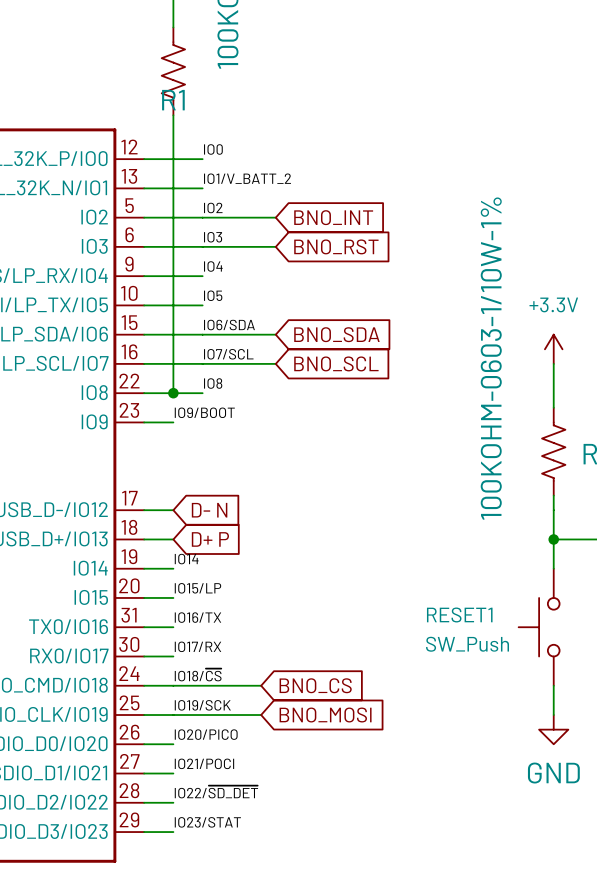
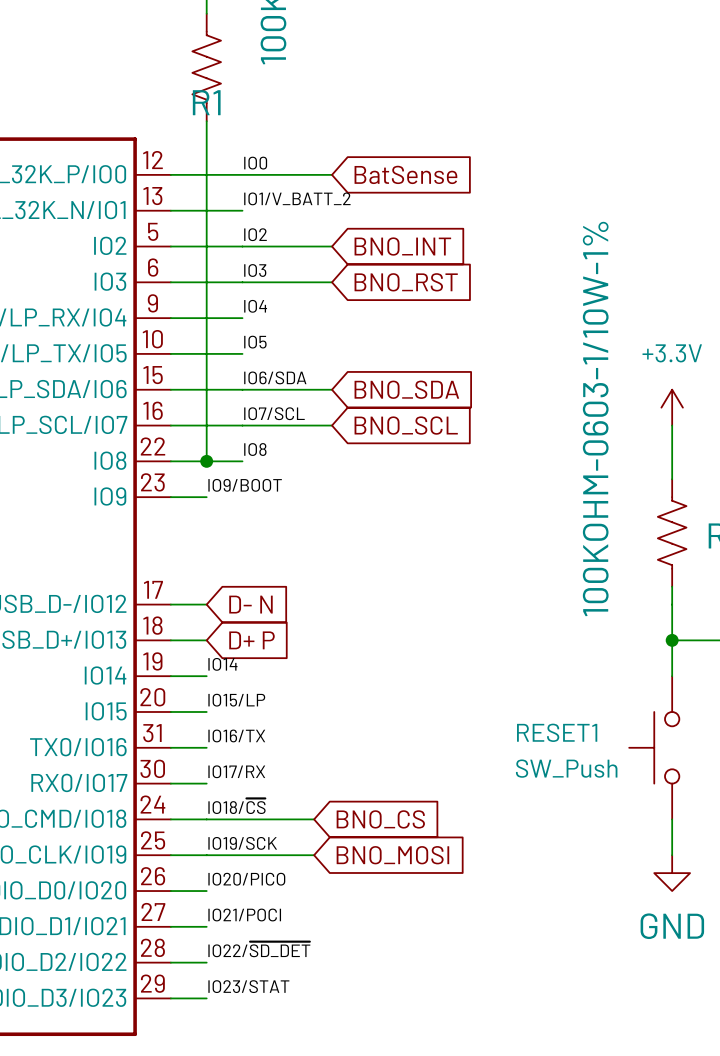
wire: none -> (242, 174) (332, 174)
global label: none -> BatSense (405, 174)

